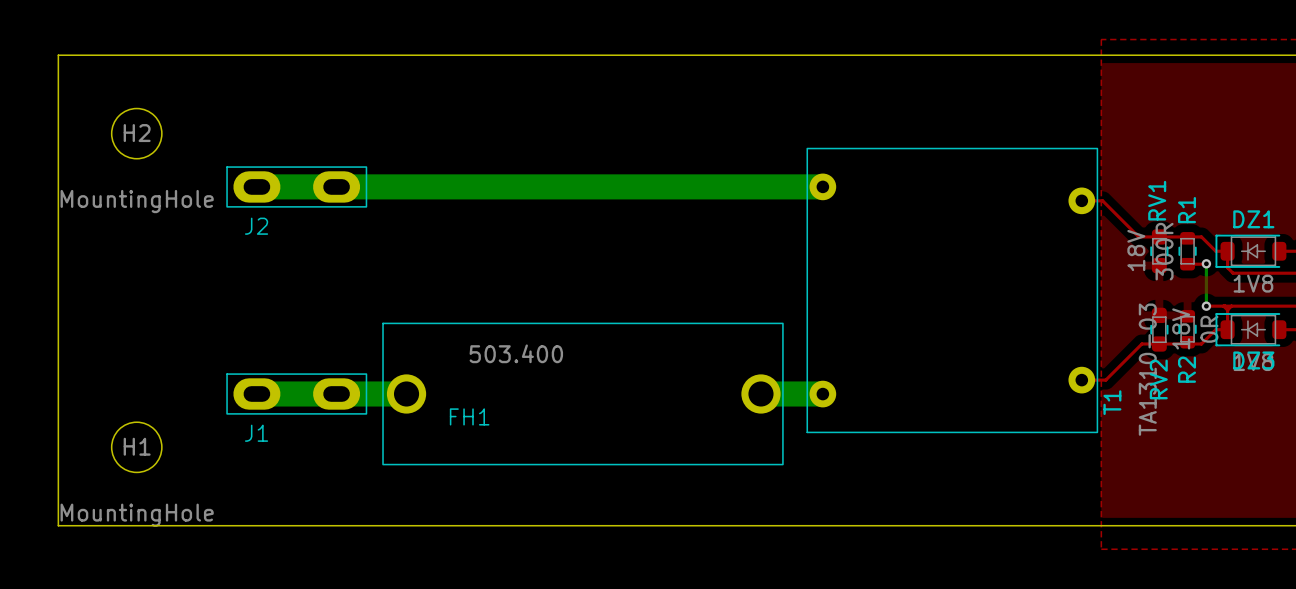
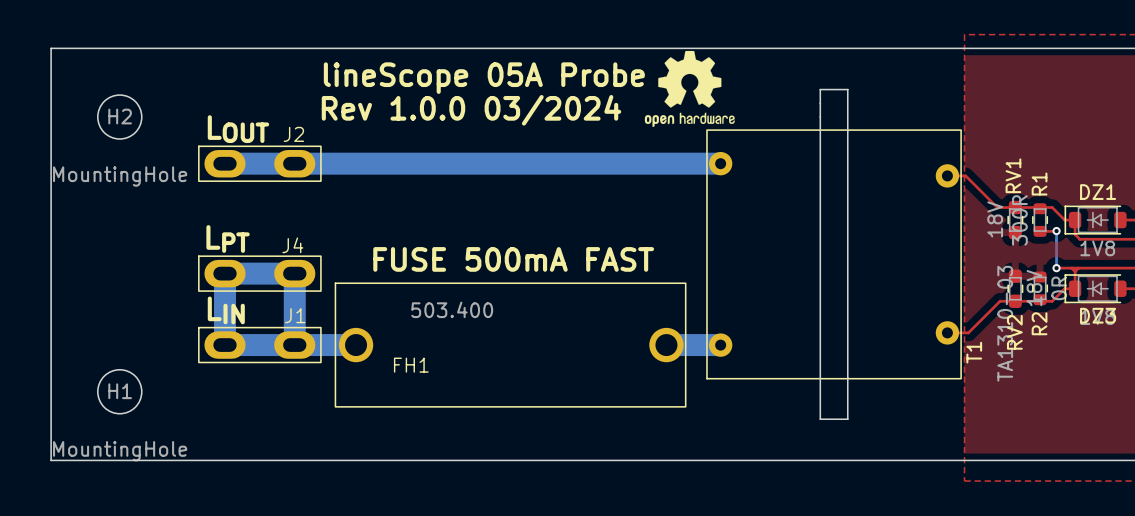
drawing: none -> [644, 50, 735, 128]
text: none -> lineScope 05A Probe (484, 78)
board edge: none -> (820, 89) (820, 419) (847, 419) (847, 89) (820, 89)
text: none -> Rev 1.0.0 03/2024 (471, 110)
text: none -> LOUT (238, 129)
J2 name position: J2 (256, 226) -> J2 (293, 134)
text: none -> LPT (228, 238)
text: none -> FUSE 500mA FAST (513, 259)
J4: none -> (259, 273)
text: none -> LIN (226, 310)
bottom track: none -> (225, 345) (225, 273) (294, 273) (294, 345)
J1 name position: J1 (256, 433) -> J1 (295, 315)

